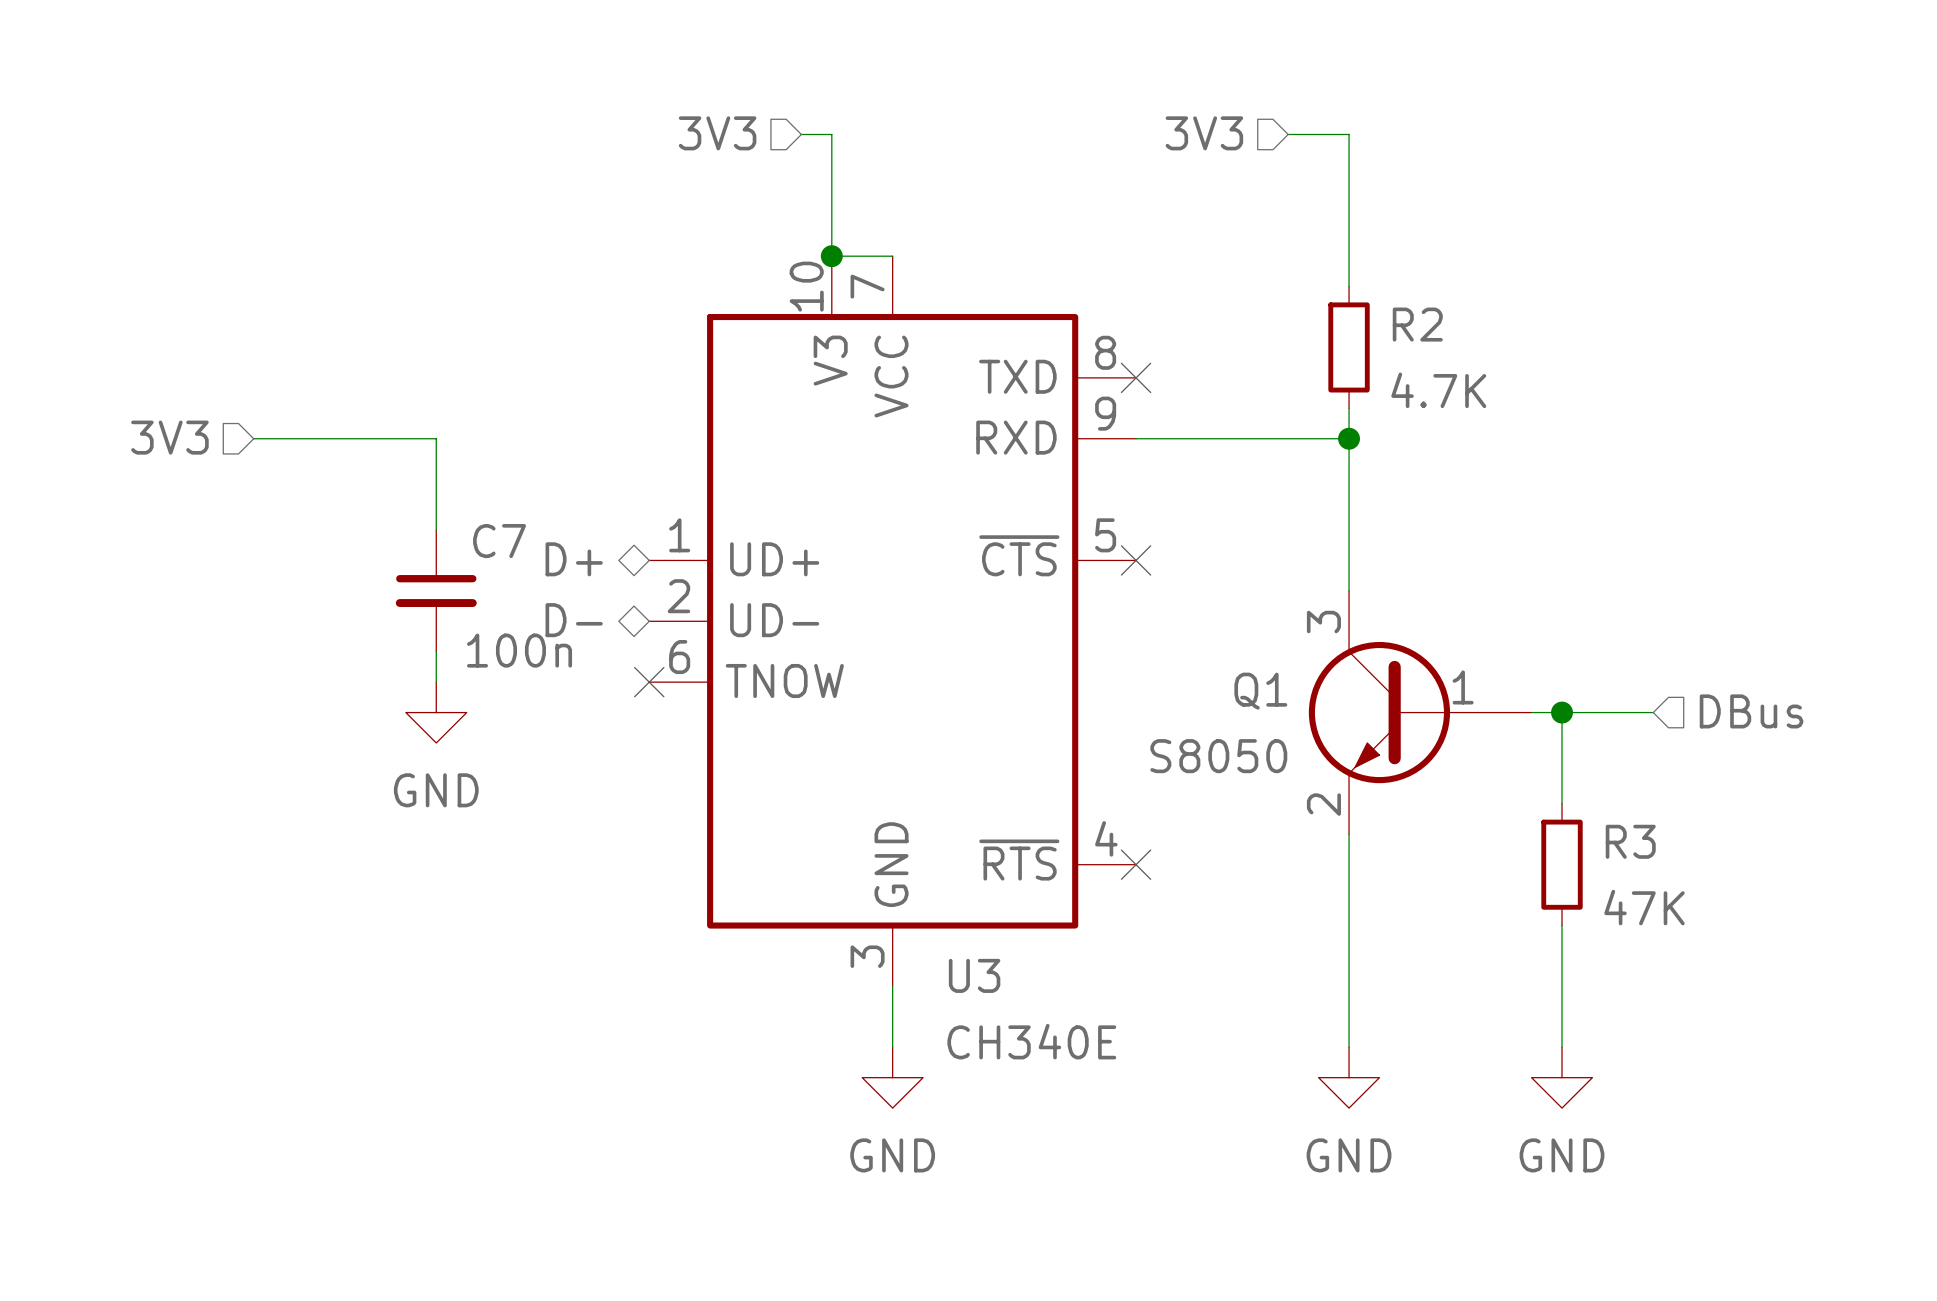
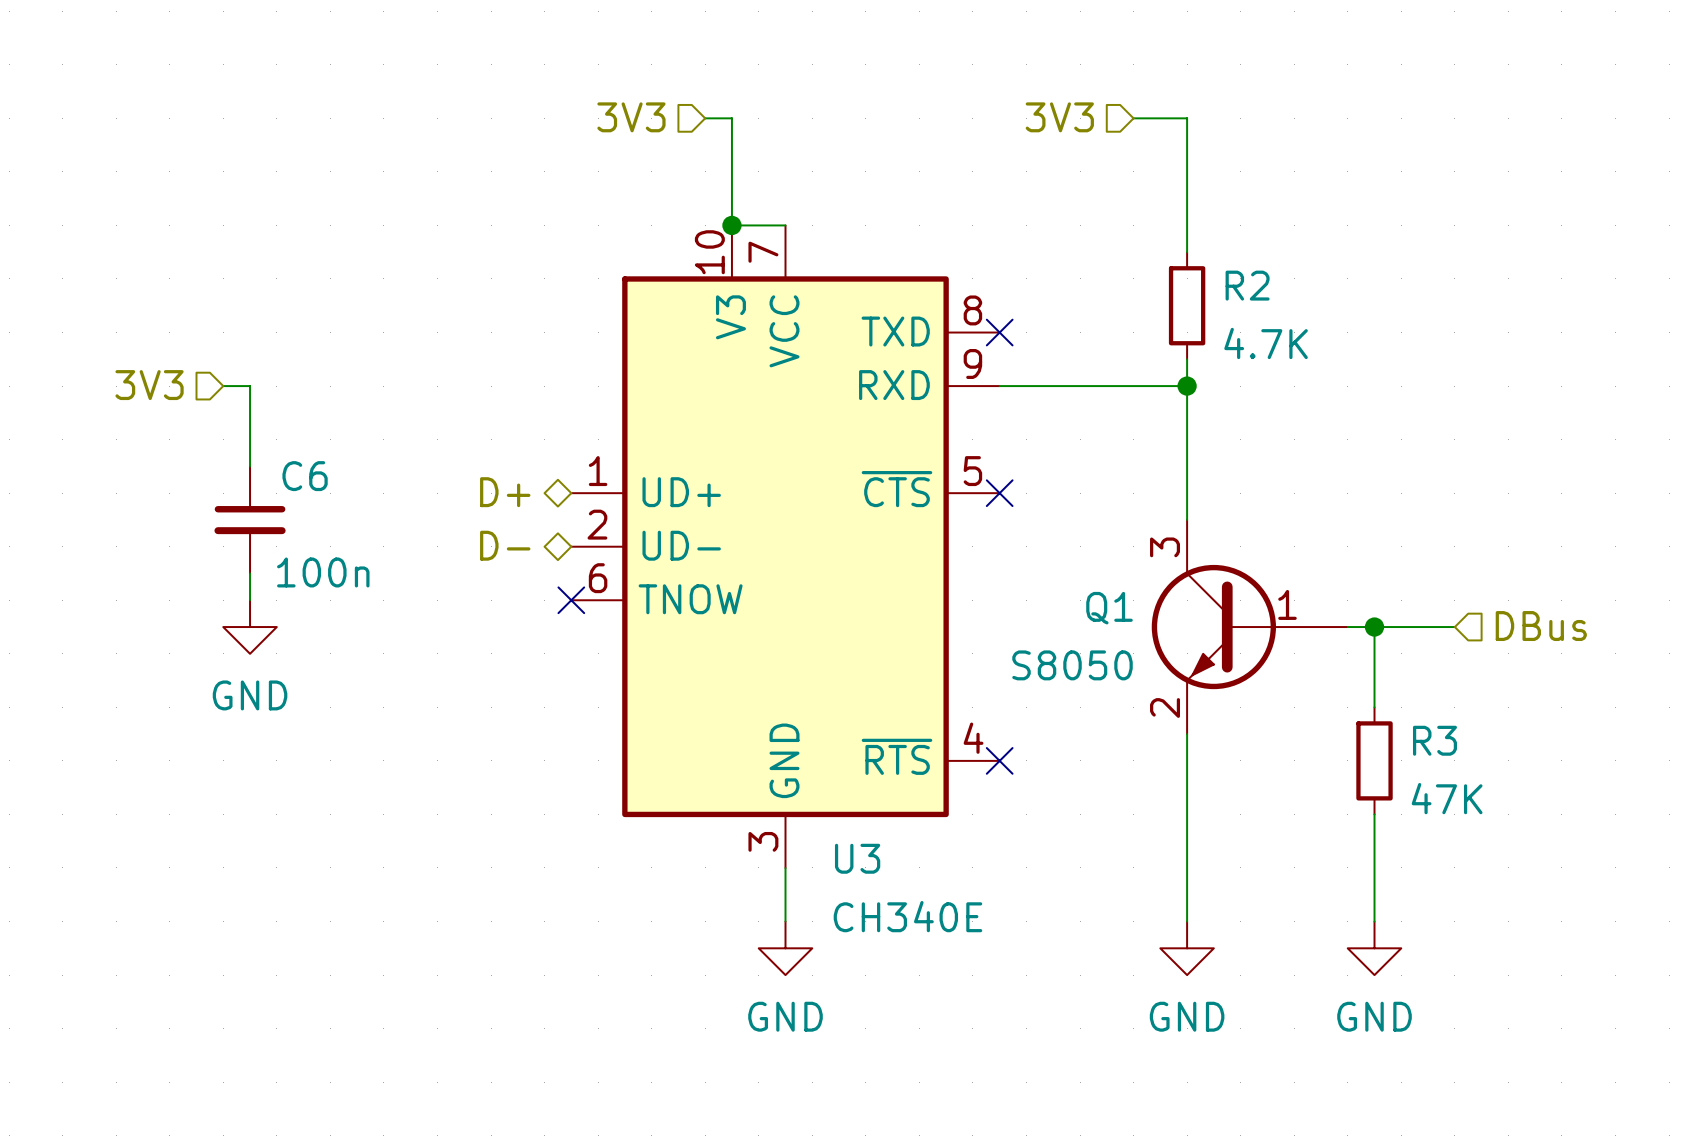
wire: (284, 438) (436, 438) (436, 530) -> (250, 386) (250, 466)
C6: none -> 100n (250, 519)
C7: 100n (436, 590) -> none
wire: (436, 651) (436, 682) -> (250, 573) (250, 600)
power symbol position: GND (436, 712) -> GND (250, 627)

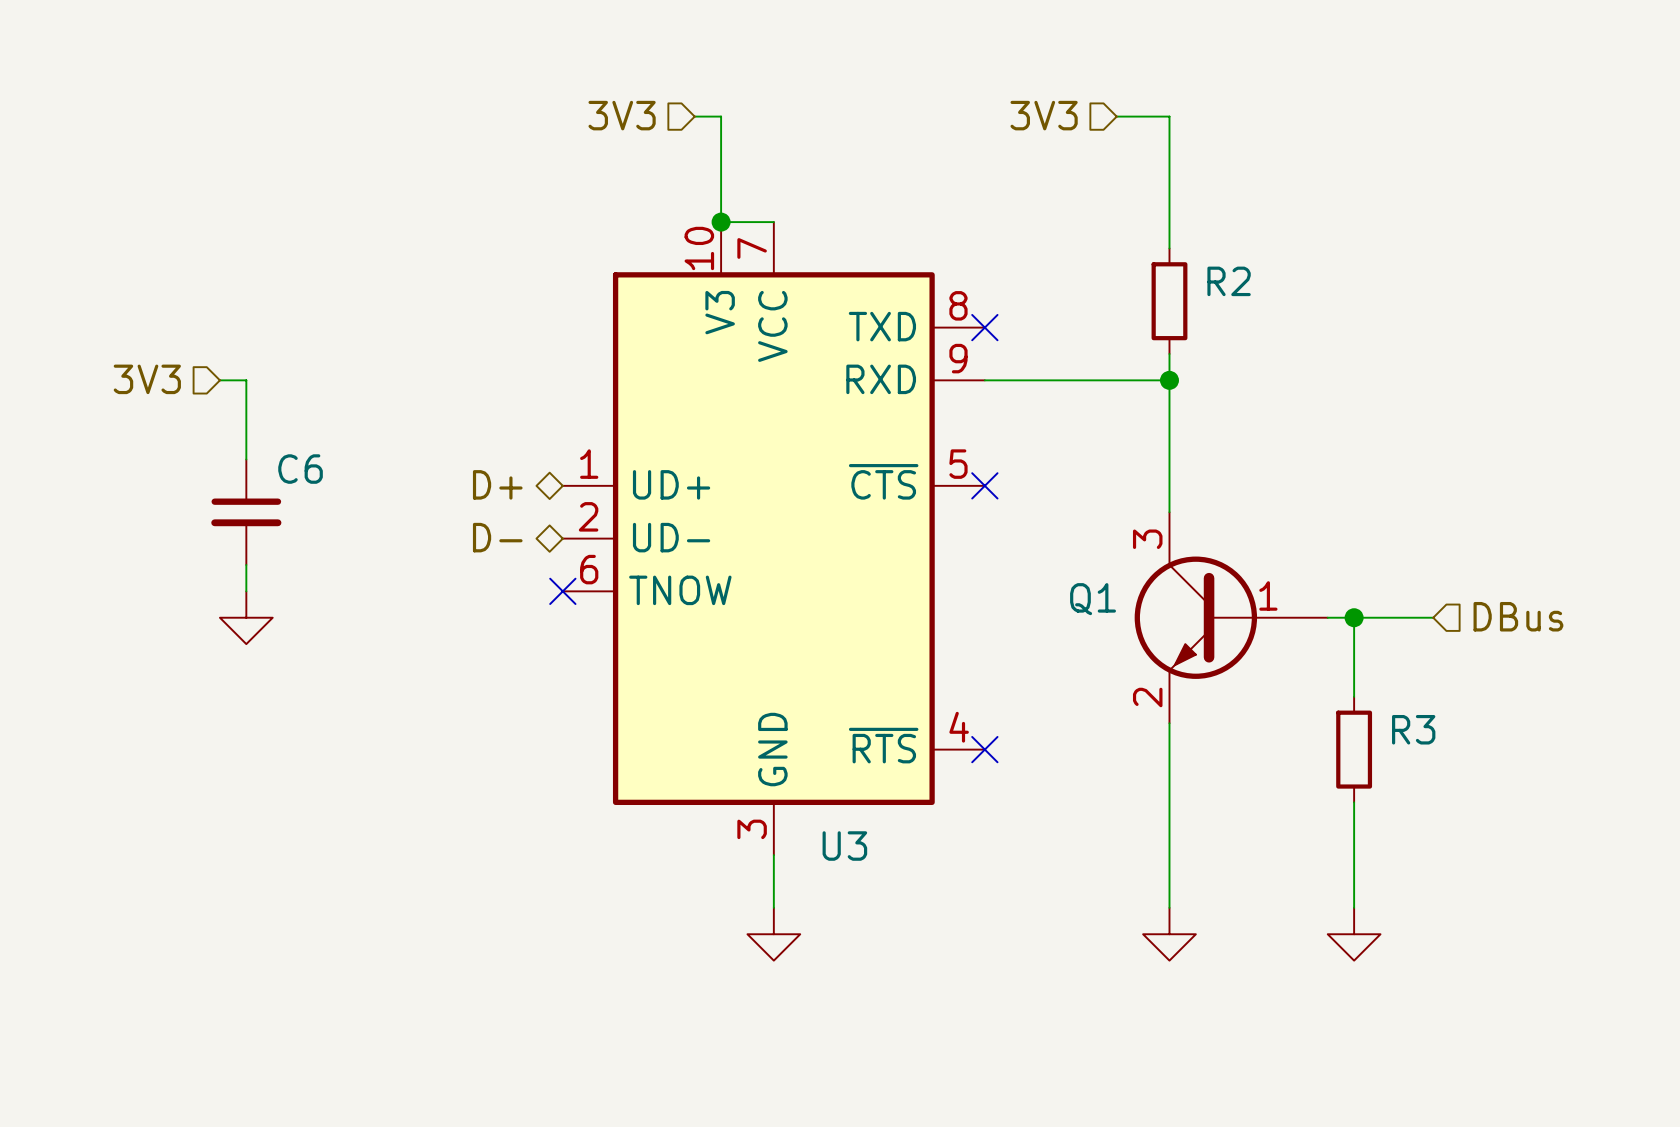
R2 value: 4.7K (1266, 343) -> none
C6 value: 100n (323, 572) -> none
Q1 value: S8050 (1072, 665) -> none
power symbol text: GND (250, 695) -> none
R3 value: 47K (1447, 798) -> none
U3 value: CH340E (907, 916) -> none
power symbol text: GND (785, 1016) -> none
power symbol text: GND (1187, 1016) -> none
power symbol text: GND (1374, 1016) -> none

